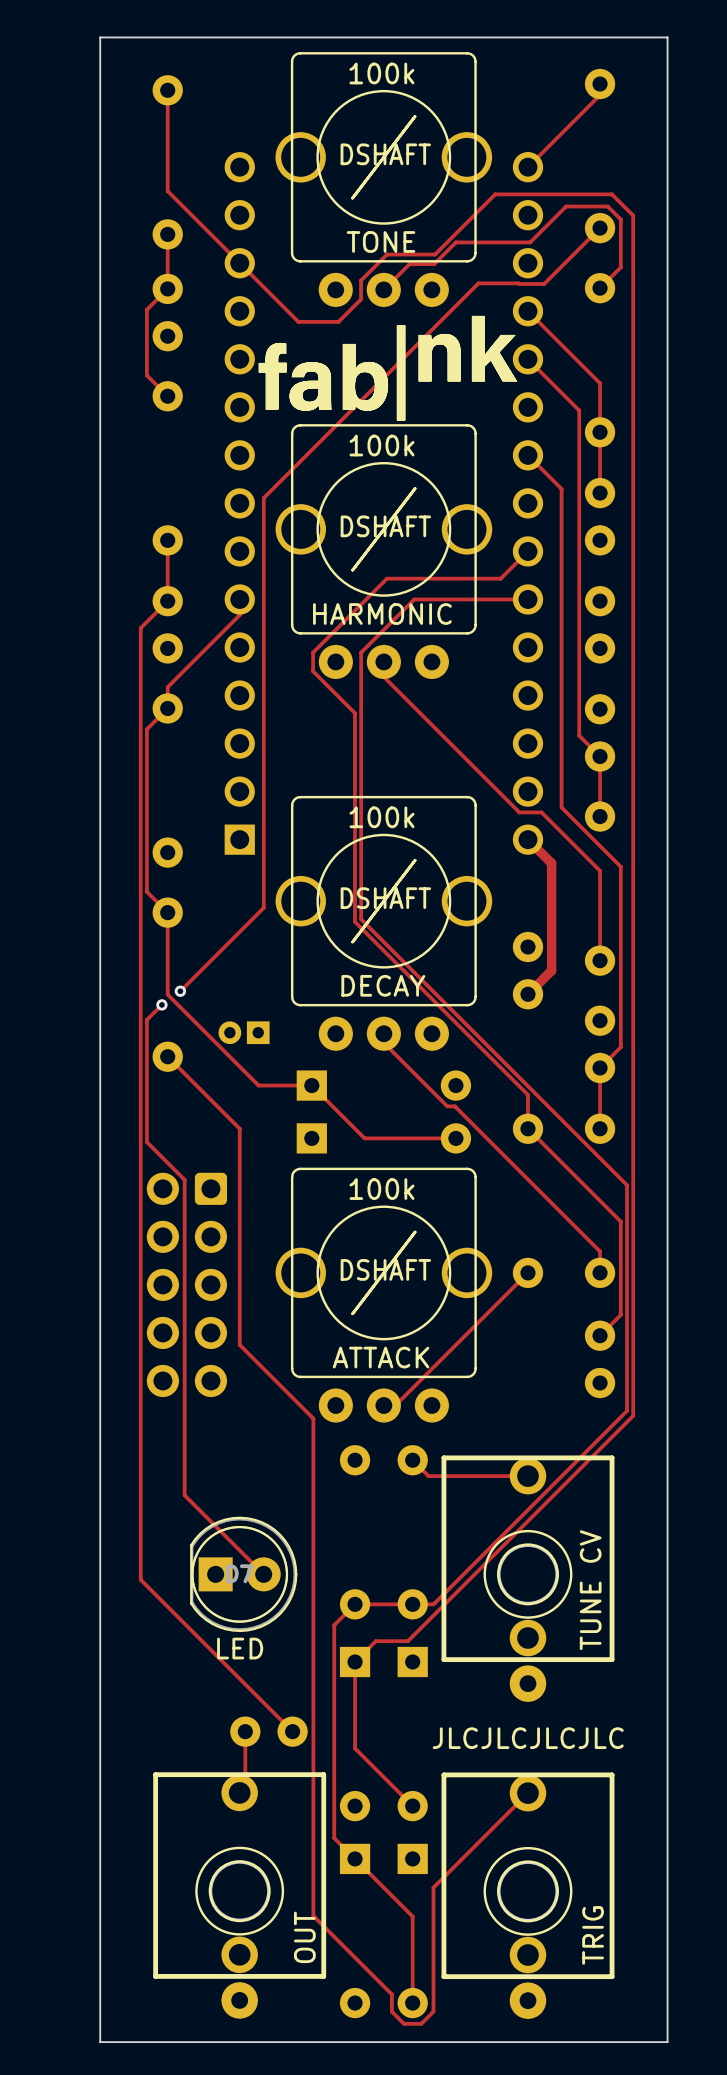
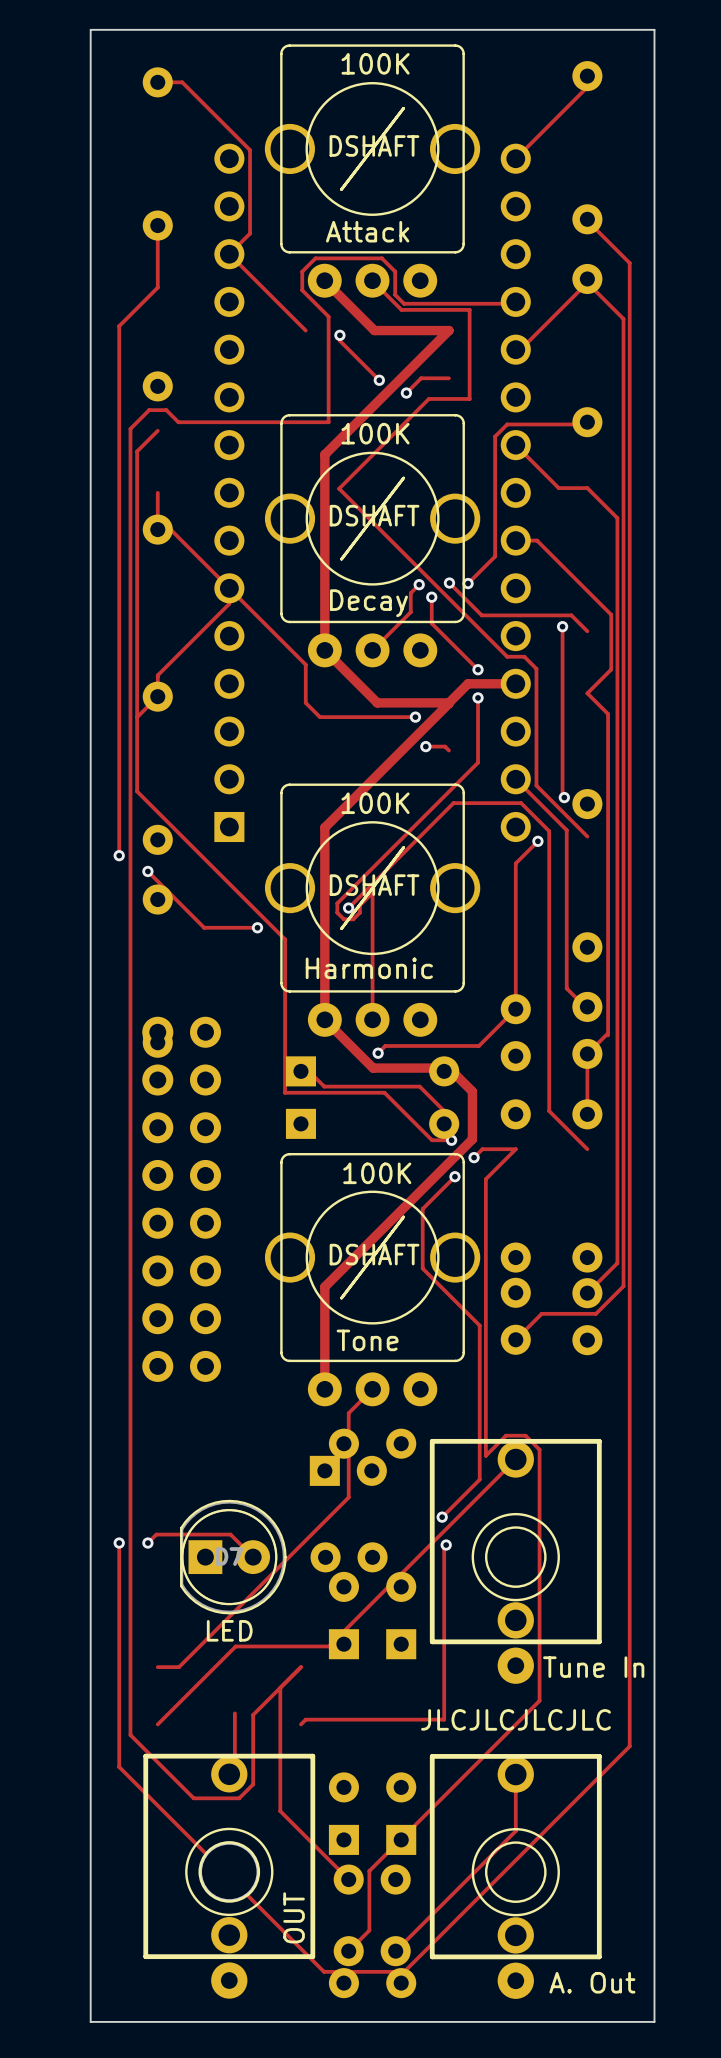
Attack value: 100k (381, 73) -> 100K (375, 63)
track: (167, 90) (167, 191) (239, 263) -> (157, 82) (182, 82) (250, 150) (250, 233) (229, 254)
track: (600, 228) (544, 284) (478, 283) (263, 498) (263, 907) (180, 991) -> none
track: none -> (587, 220) (629, 263) (629, 1746) (404, 1971) (324, 1971) (119, 1767) (119, 1543)
Attack name: none -> Attack (367, 231)
Attack text: TONE (380, 241) -> none
track: (167, 288) (146, 309) (146, 375) (167, 396) -> (157, 279) (157, 287) (119, 326) (119, 855)
track: (600, 288) (620, 267) (620, 219) (607, 206) (566, 206) (530, 242) (455, 242) (434, 264) (409, 264) (383, 289) -> (587, 836) (536, 785) (536, 668) (524, 656) (507, 656) (339, 488) (428, 398) (469, 398) (469, 309) (401, 309) (372, 280)
track: none -> (324, 280) (374, 330) (448, 330) (324, 454) (324, 650) (377, 702) (448, 702)
track: (527, 311) (600, 383) (600, 493) -> (515, 301) (513, 303) (404, 303) (395, 294) (395, 271) (381, 258) (315, 258) (302, 271) (302, 290) (328, 316) (328, 422) (178, 422) (166, 410) (149, 410) (130, 428) (130, 1735) (193, 1798) (239, 1798) (253, 1784) (253, 1714) (300, 1667)
part: (167, 312) -> none
drawing: [258, 315, 518, 421] -> none
track: (298, 321) (338, 321) (361, 299) (361, 280) (387, 254) (435, 254) (495, 194) (611, 194) (633, 215) (633, 1415) (407, 1641) (375, 1641) (355, 1661) (355, 1748) (412, 1806) -> (287, 312) (305, 330)
track: none -> (339, 335) (339, 340) (379, 380)
via: none -> (339, 335)
track: (527, 359) (579, 410) (579, 735) (600, 756) (600, 816) -> (515, 349) (520, 349) (587, 282) (623, 318) (623, 1286) (595, 1313) (541, 1313) (515, 1339)
track: none -> (448, 378) (421, 378) (406, 393)
via: none -> (379, 380)
via: none -> (406, 393)
track: none -> (587, 426) (585, 424) (507, 424) (495, 436) (495, 556) (468, 583)
track: none -> (157, 430) (137, 451) (137, 717)
Decay value: 100k (381, 445) -> 100K (375, 433)
track: (561, 488) (561, 807) (620, 866) -> (515, 540) (537, 540) (611, 614) (611, 669) (587, 693) (608, 714) (608, 853)
track: none -> (549, 478) (558, 488) (587, 488) (617, 518) (617, 1263) (587, 1293)
track: none -> (157, 492) (157, 516) (305, 664) (305, 702) (319, 717) (415, 717)
part: (600, 516) -> none
track: (167, 540) (167, 601) (140, 628) (140, 1579) (292, 1731) -> none
track: (527, 551) (500, 578) (386, 578) (313, 652) (313, 671) (354, 713) (354, 921) (527, 1094) (527, 1128) (620, 1221) (620, 1314) (600, 1335) -> none
track: none -> (449, 583) (481, 615) (571, 615) (587, 631)
via: none -> (449, 583)
via: none -> (468, 583)
via: none -> (419, 584)
track: (527, 599) (414, 599) (361, 652) (361, 919) (627, 1185) (627, 1410) (433, 1604) (355, 1604) (334, 1625) (334, 1838) (412, 1916) (412, 2003) -> none
track: none -> (431, 597) (431, 623) (478, 669)
via: none -> (431, 597)
Decay name: none -> Decay (368, 603)
Decay text: HARMONIC (382, 614) -> none
part: (167, 624) -> none
part: (600, 624) -> none
track: none -> (562, 626) (562, 795) (564, 797)
via: none -> (562, 626)
track: (383, 661) (383, 676) (519, 812) (541, 812) (600, 870) (600, 960) -> (372, 650) (410, 612) (410, 593) (419, 584)
via: none -> (478, 669)
track: none -> (515, 683) (468, 683) (448, 702)
via: none -> (478, 697)
track: none -> (448, 702) (324, 827) (324, 1019) (373, 1068) (448, 1068) (472, 1091) (472, 1139) (324, 1286) (324, 1389)
via: none -> (415, 717)
part: (600, 732) -> none
track: none -> (425, 746) (445, 746) (448, 750)
via: none -> (425, 746)
track: none -> (515, 779) (566, 830) (566, 988) (587, 1009)
track: (146, 803) (146, 891) (167, 912) (167, 994) (258, 1085) (311, 1085) (364, 1138) (455, 1138) -> (137, 791) (285, 939) (285, 1092) (384, 1092) (432, 1140) (451, 1140)
via: none -> (564, 797)
Harmonic value: 100k (381, 817) -> 100K (375, 803)
track: (527, 839) (551, 863) (551, 970) (527, 994) -> none
track: none -> (537, 841) (515, 863) (515, 1009) (478, 1045) (385, 1045) (378, 1053)
via: none -> (537, 841)
via: none -> (119, 855)
track: none -> (147, 871) (204, 927) (257, 927)
via: none -> (147, 871)
track: none -> (348, 908) (453, 803) (521, 803) (549, 831) (549, 1111) (587, 1149)
via: none -> (348, 908)
via: none -> (257, 927)
part position: (527, 970) -> (515, 1032)
Harmonic name: none -> Harmonic (369, 968)
Harmonic text: DECAY (383, 985) -> none
via: (180, 991) -> none
track: (161, 1004) (146, 1019) (146, 1142) (184, 1179) (184, 1495) (241, 1551) -> (147, 1543) (156, 1534) (230, 1534)
via: (161, 1004) -> none
part: (244, 1032) -> none
track: (383, 1033) (383, 1042) (447, 1106) (454, 1106) (600, 1251) (600, 1272) -> (372, 1019) (372, 892) (359, 905) (359, 912) (353, 919) (343, 919) (337, 912) (337, 903) (478, 762) (478, 697)
track: (167, 1056) (239, 1128) (239, 1344) (313, 1418) (313, 1915) (391, 1994) (391, 2011) (404, 2023) (421, 2023) (433, 2011) (433, 1887) (527, 1793) -> (395, 1951) (515, 1831) (515, 1774)
via: none -> (378, 1053)
track: none -> (305, 1068) (324, 1086) (419, 1086) (448, 1115)
via: none -> (451, 1140)
track: none -> (474, 1157) (482, 1149) (515, 1149) (485, 1179) (485, 1455) (505, 1435) (525, 1435) (539, 1449) (539, 1700) (369, 1871) (369, 1930) (348, 1951)
via: none -> (474, 1157)
Tone value: 100k (381, 1189) -> 100K (377, 1173)
track: none -> (454, 1176) (422, 1208) (422, 1268) (479, 1325) (479, 1479) (442, 1517)
via: none -> (454, 1176)
part: none -> (181, 1199)
track: (527, 1272) (395, 1405) (383, 1405) -> (157, 1667) (179, 1667) (348, 1497) (348, 1413) (372, 1389)
part: (186, 1284) -> none
part: none -> (515, 1316)
Tone name: none -> Tone (367, 1340)
Tone text: ATTACK (381, 1357) -> none
part position: (600, 1359) -> (587, 1316)
part footprint: [441, 1455, 615, 1702] -> [429, 1438, 602, 1684]
track: (412, 1460) (428, 1476) (527, 1476) -> (157, 1724) (235, 1646) (328, 1646) (515, 1459)
part: none -> (348, 1470)
via: none -> (442, 1517)
via: none -> (119, 1543)
via: none -> (147, 1543)
track: none -> (446, 1545) (444, 1547) (444, 1719) (305, 1719) (300, 1724)
via: none -> (446, 1545)
part: none -> (349, 1557)
part value: TUNE CV (590, 1590) -> Tune In (593, 1667)
track: none -> (280, 1687) (280, 1811) (348, 1879)
part: (268, 1731) -> none
part footprint: [441, 1772, 615, 2019] -> [429, 1754, 602, 1999]
part: none -> (372, 1879)
part value: TRIG (593, 1935) -> A. Out (592, 1982)
part: none -> (372, 1951)

